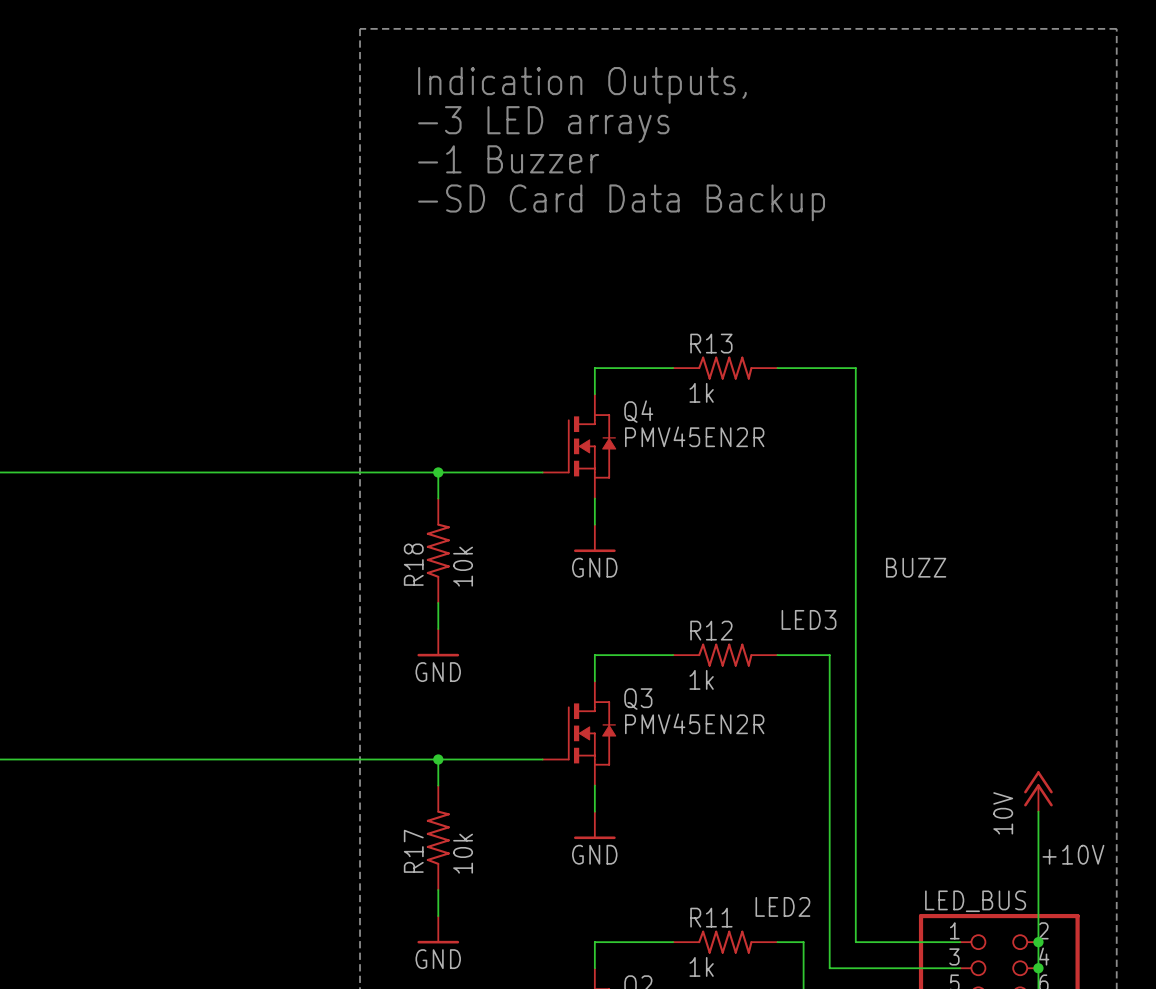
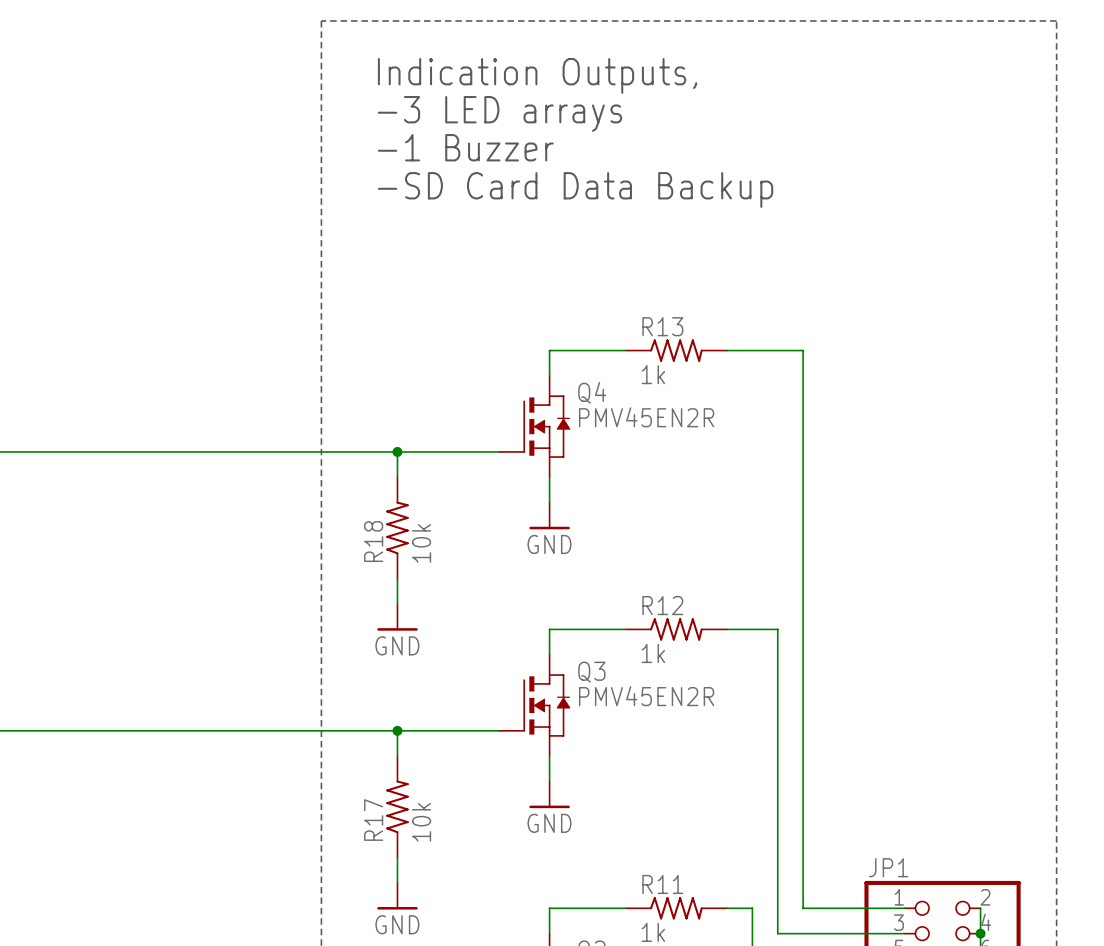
label: BUZZ (916, 567) -> none
label: LED3 (809, 619) -> none
power symbol: 10V (1038, 791) -> none
wire: (1038, 811) (1038, 942) -> none
label: +10V (1073, 854) -> none
LED_BUS name: LED_BUS (975, 901) -> JP1 (888, 867)
label: LED2 (782, 906) -> none
junction: (1038, 942) -> none

